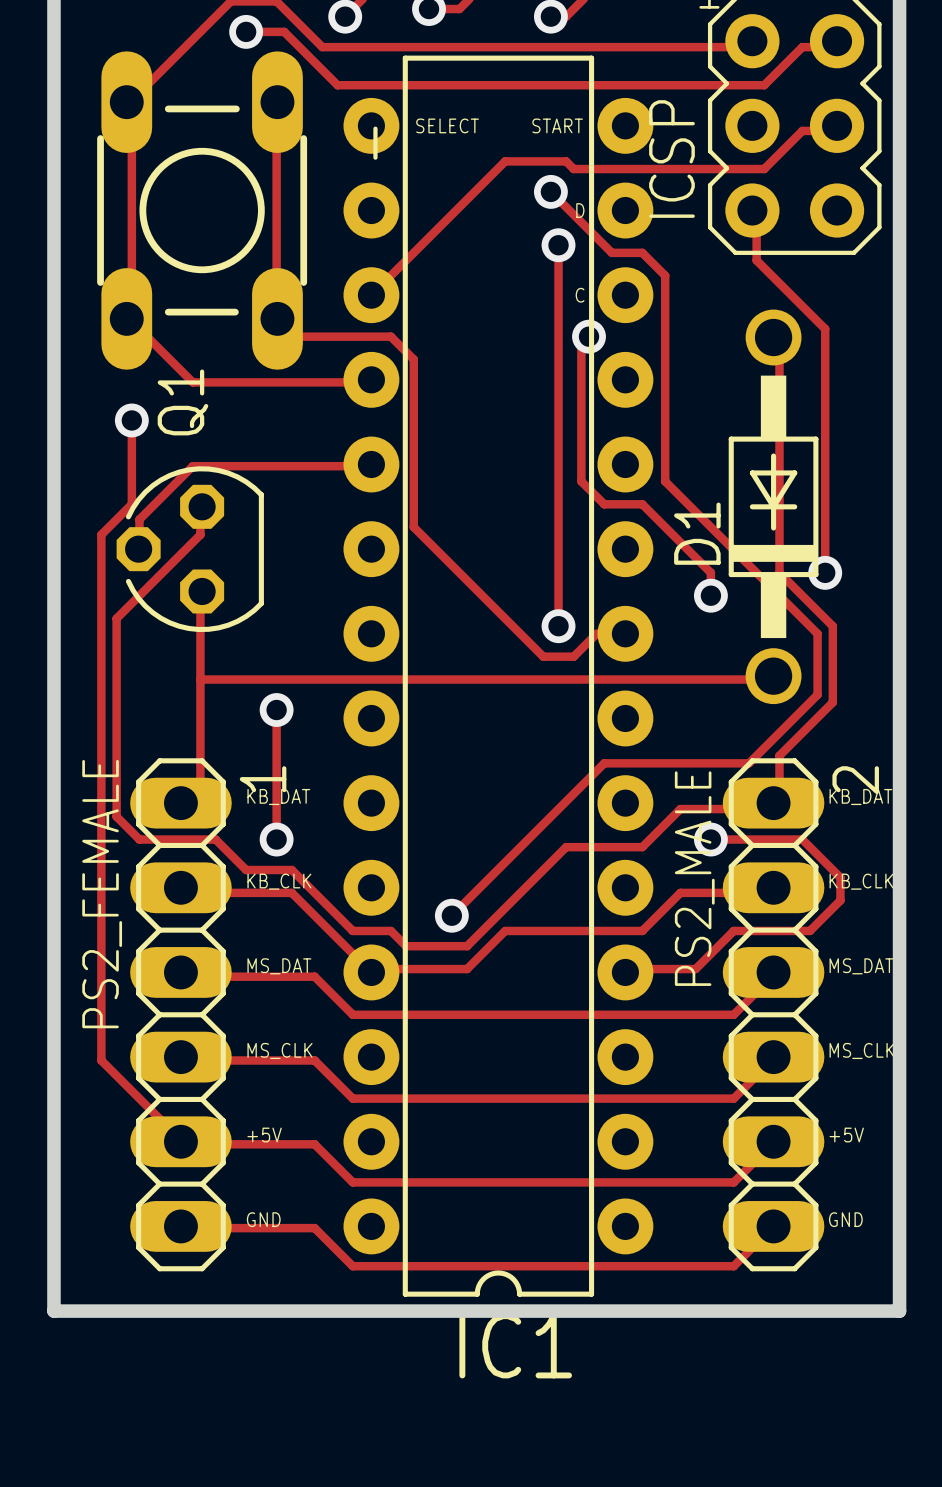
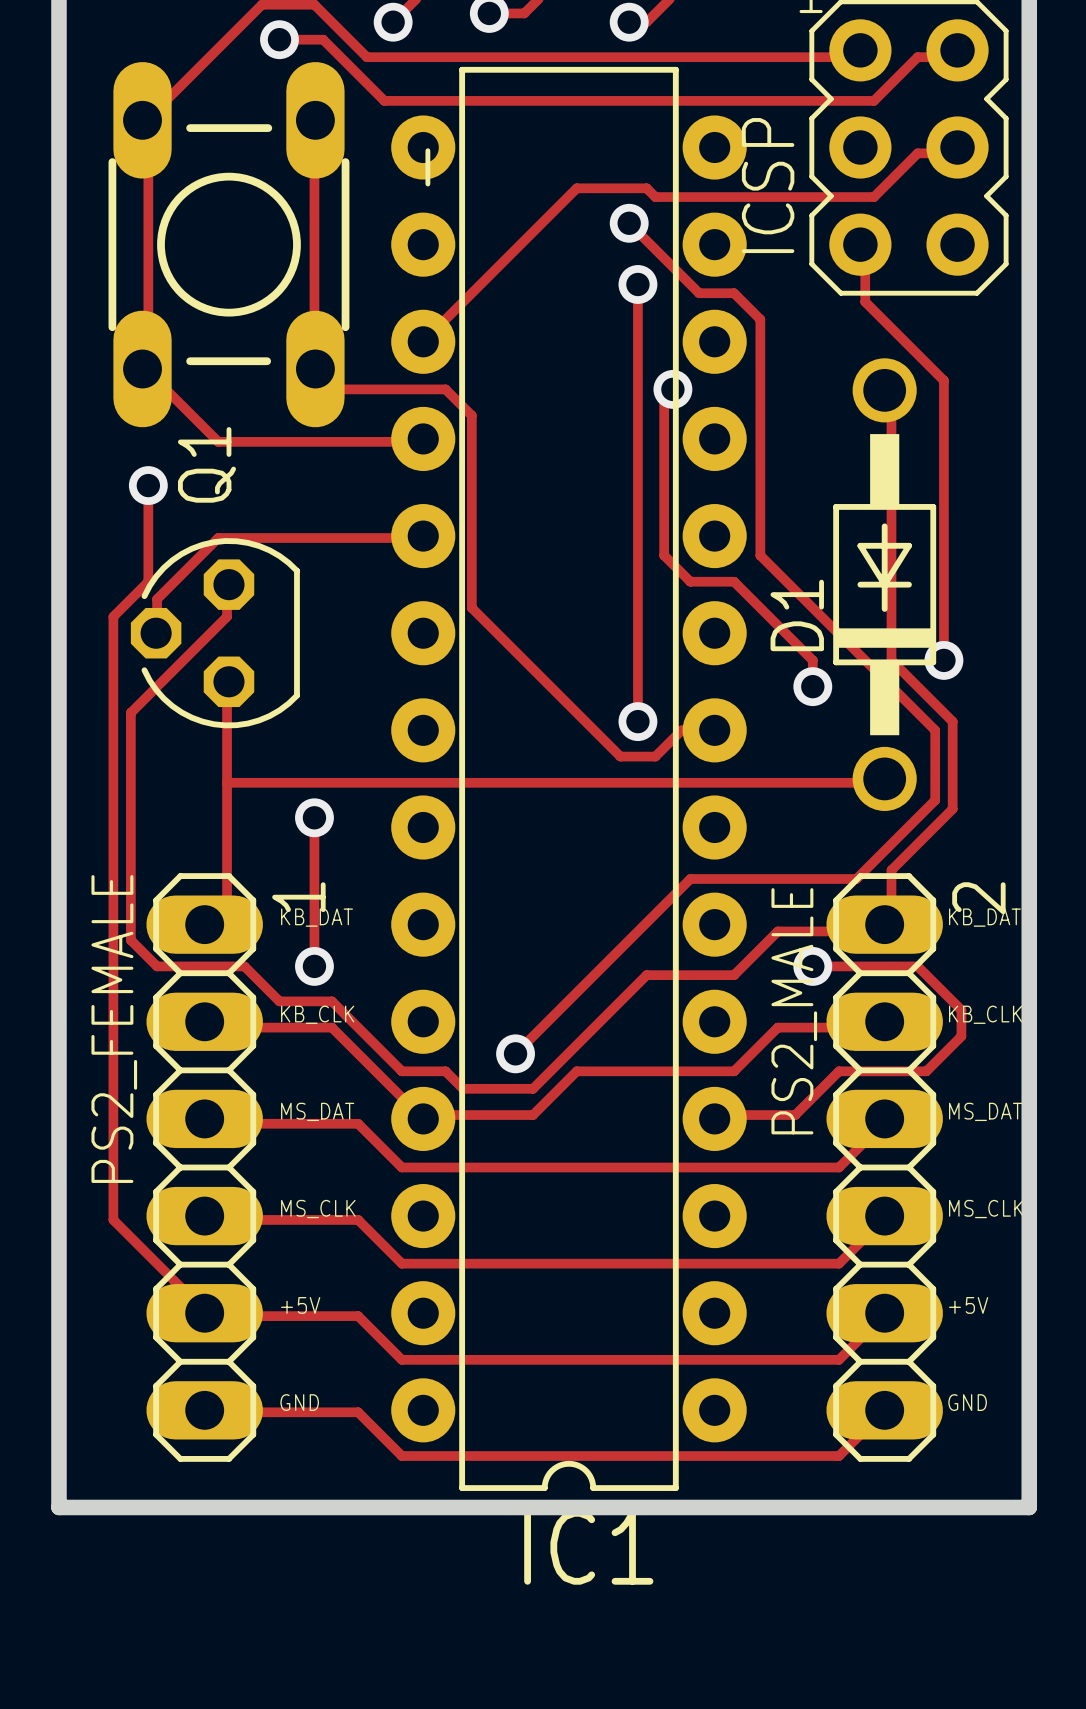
text: SELECT (447, 125) -> none
text: START (557, 125) -> none
text: D (580, 210) -> none
text: C (580, 295) -> none

